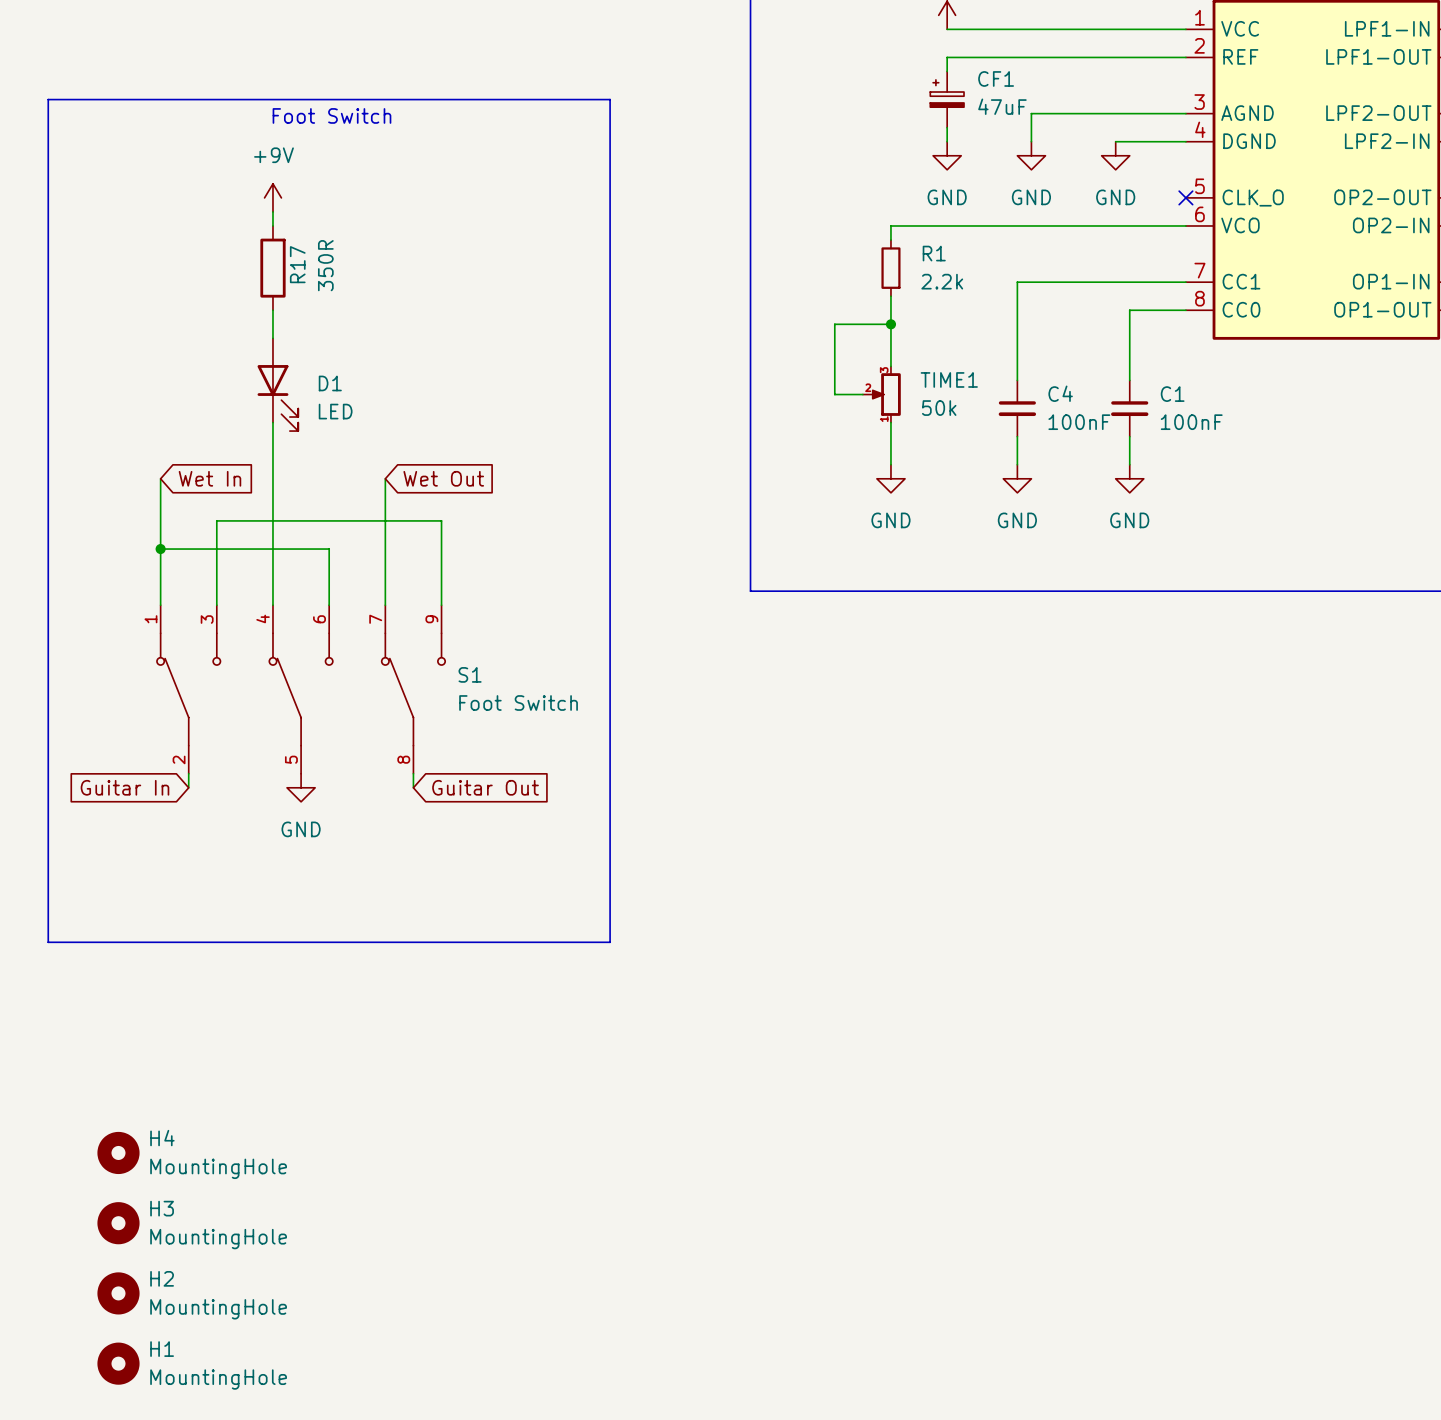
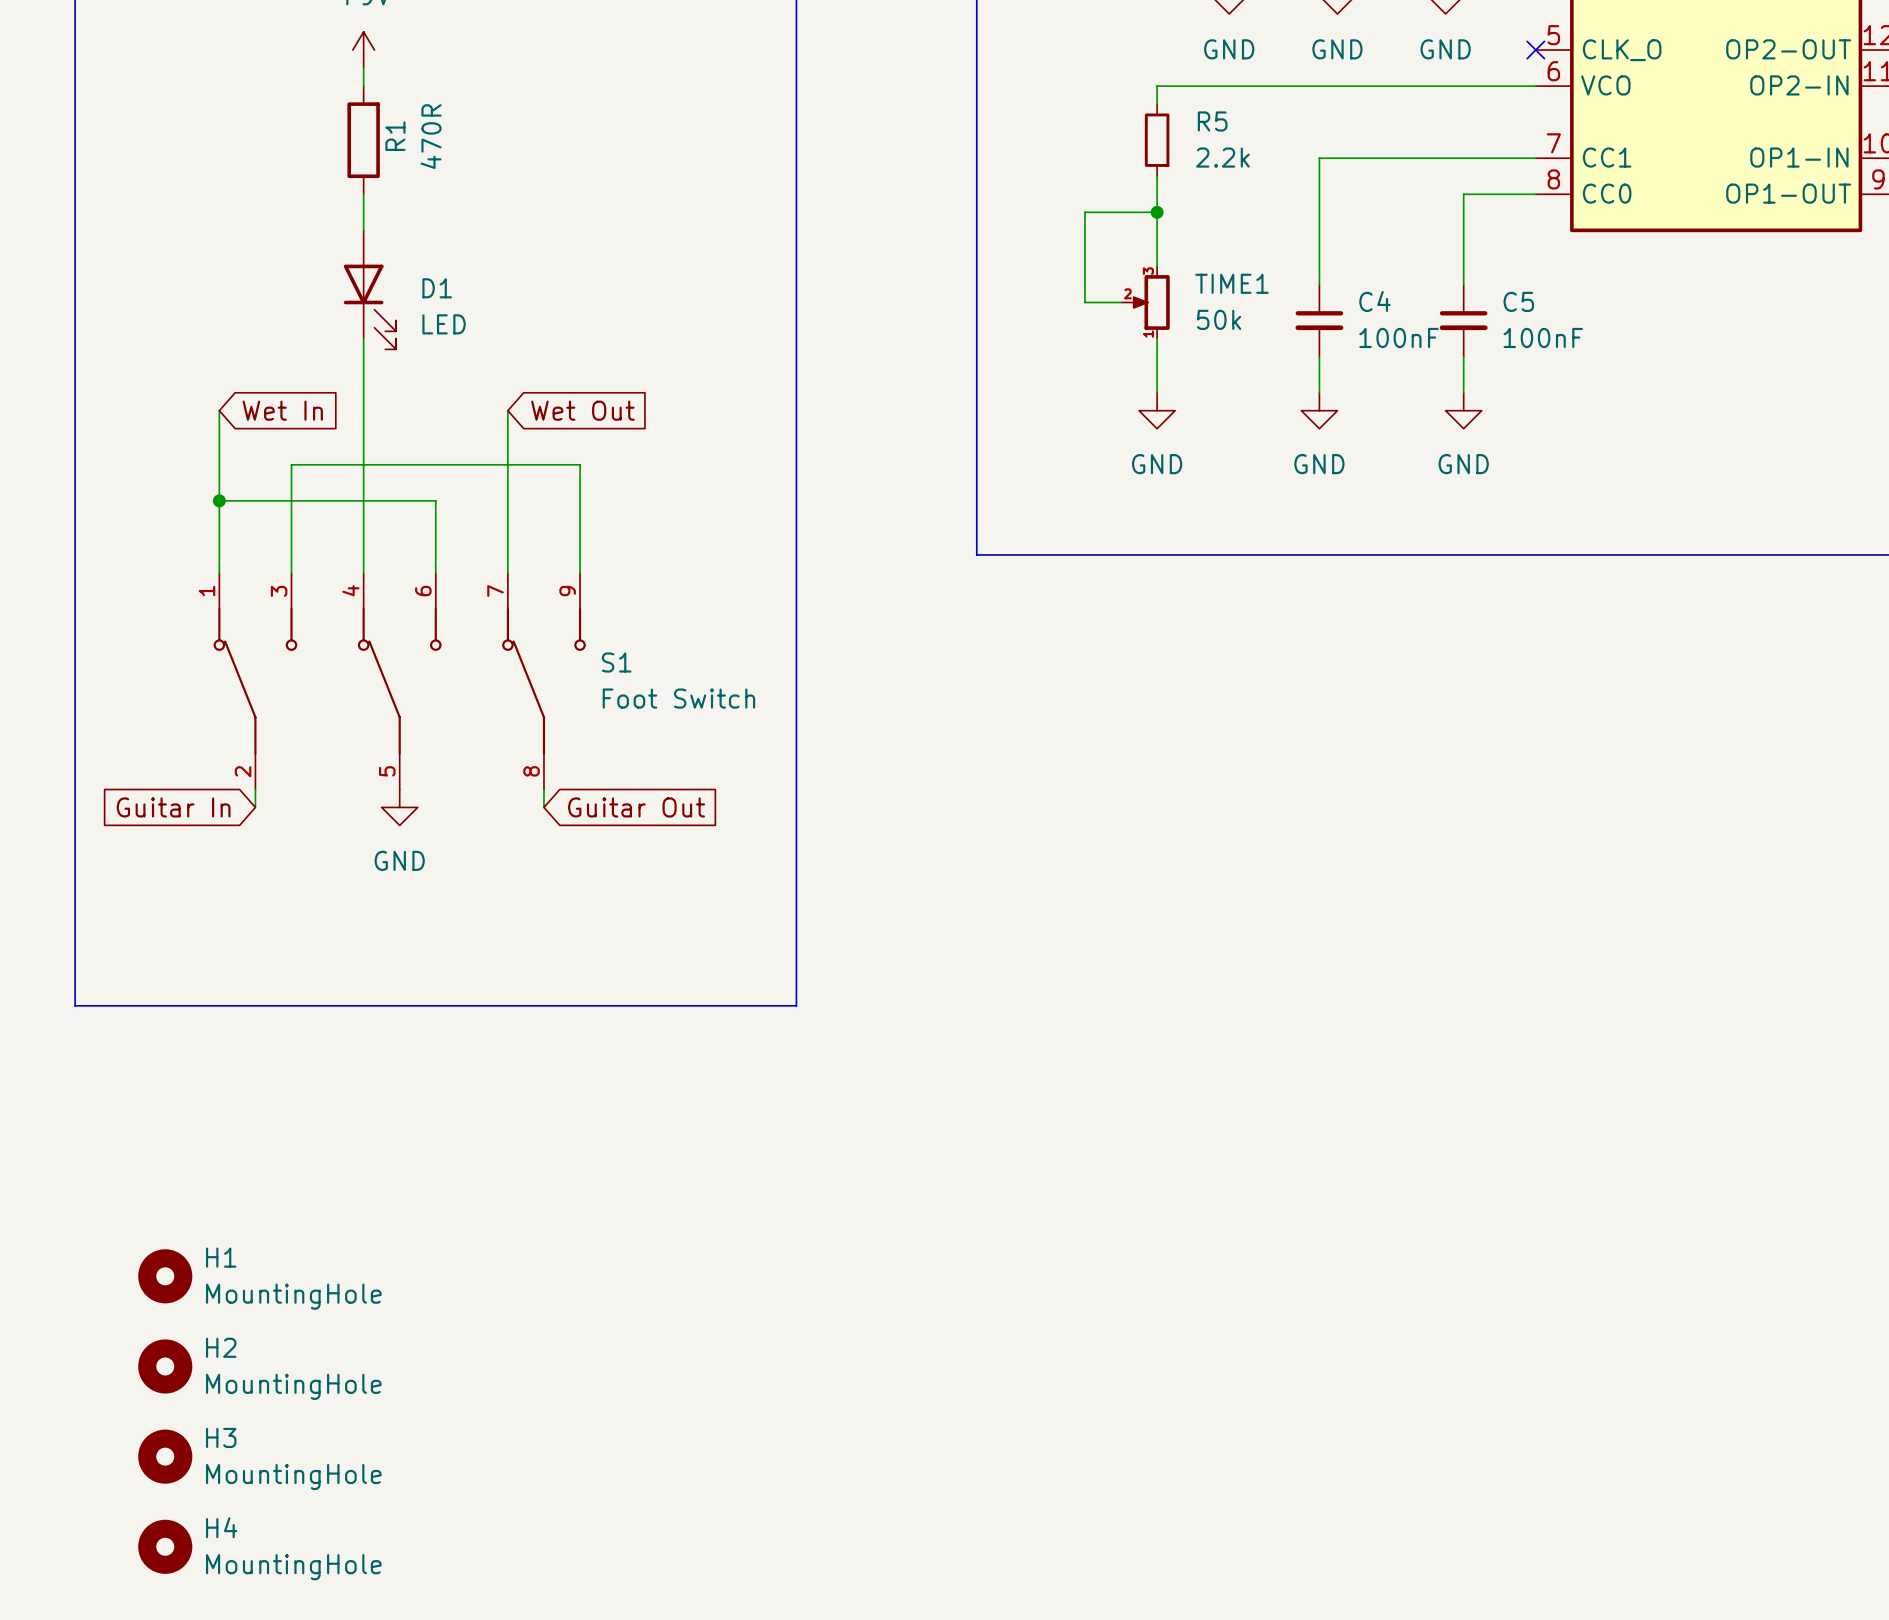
R1 name: R1 (934, 253) -> R5 (1212, 121)
R17 name: R17 (297, 264) -> R1 (395, 136)
R17 value: 350R (325, 265) -> 470R (431, 136)
C1 name: C1 (1172, 394) -> C5 (1518, 301)
H4 name: H4 (162, 1138) -> H1 (221, 1257)
H3 name: H3 (162, 1208) -> H2 (221, 1347)
H2 name: H2 (162, 1278) -> H3 (221, 1437)
H1 name: H1 (162, 1349) -> H4 (221, 1527)

